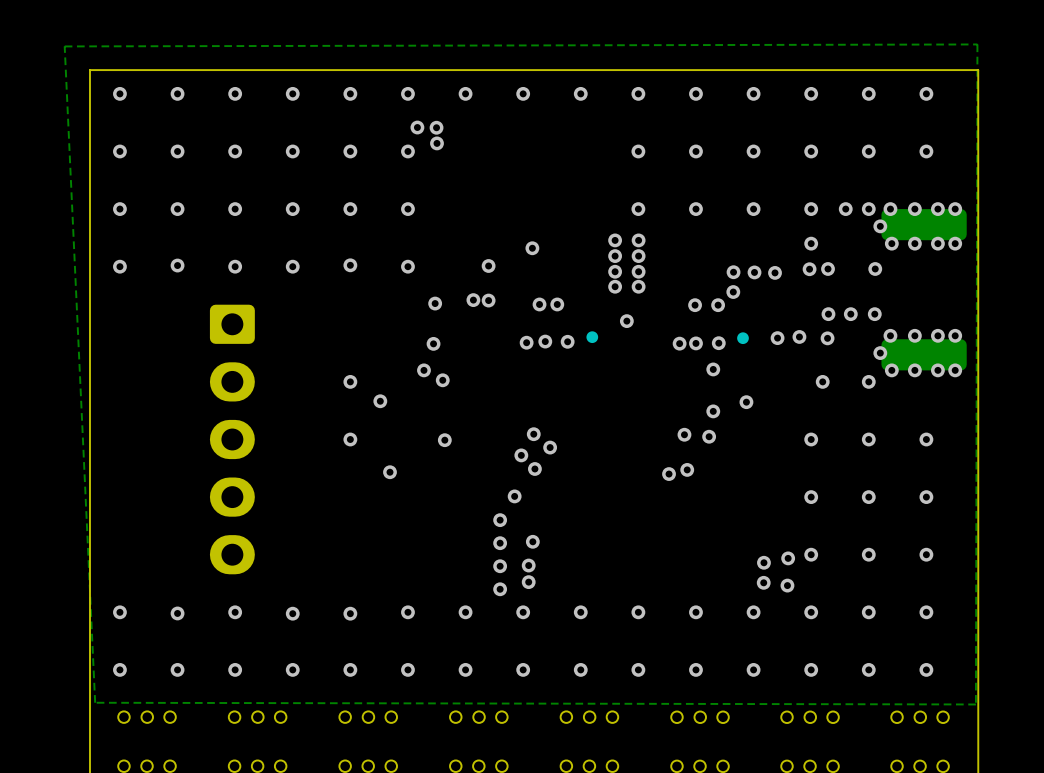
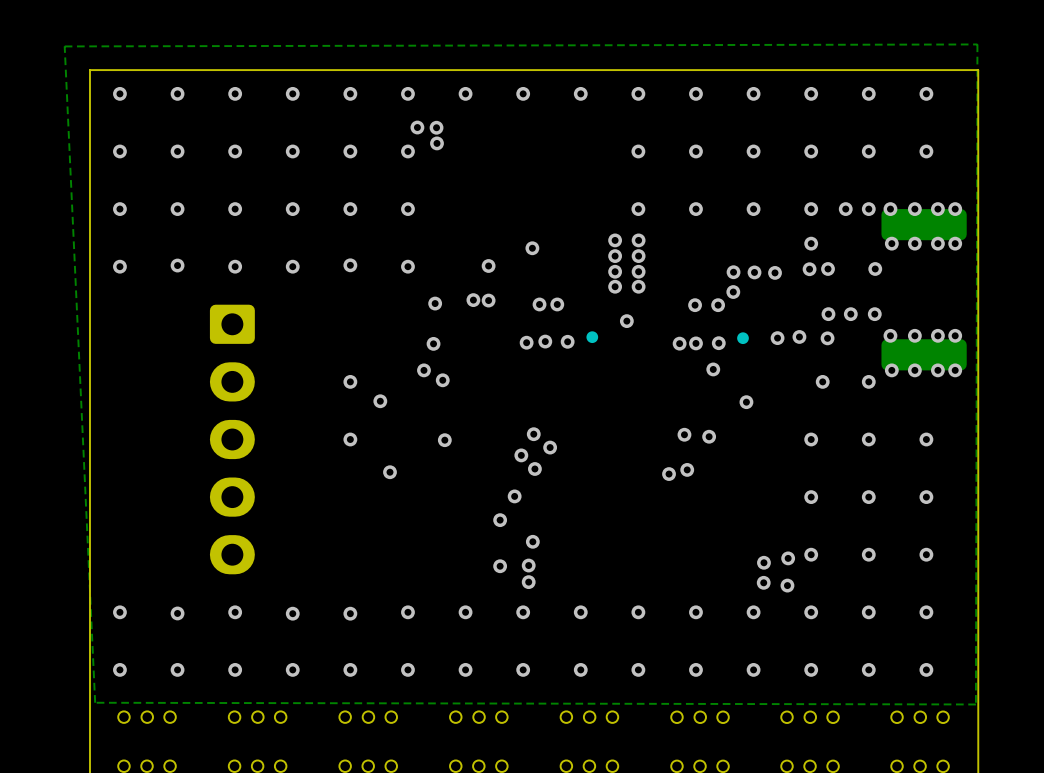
via: (880, 226) -> none
via: (880, 353) -> none
via: (713, 411) -> none
via: (500, 543) -> none
via: (500, 589) -> none

